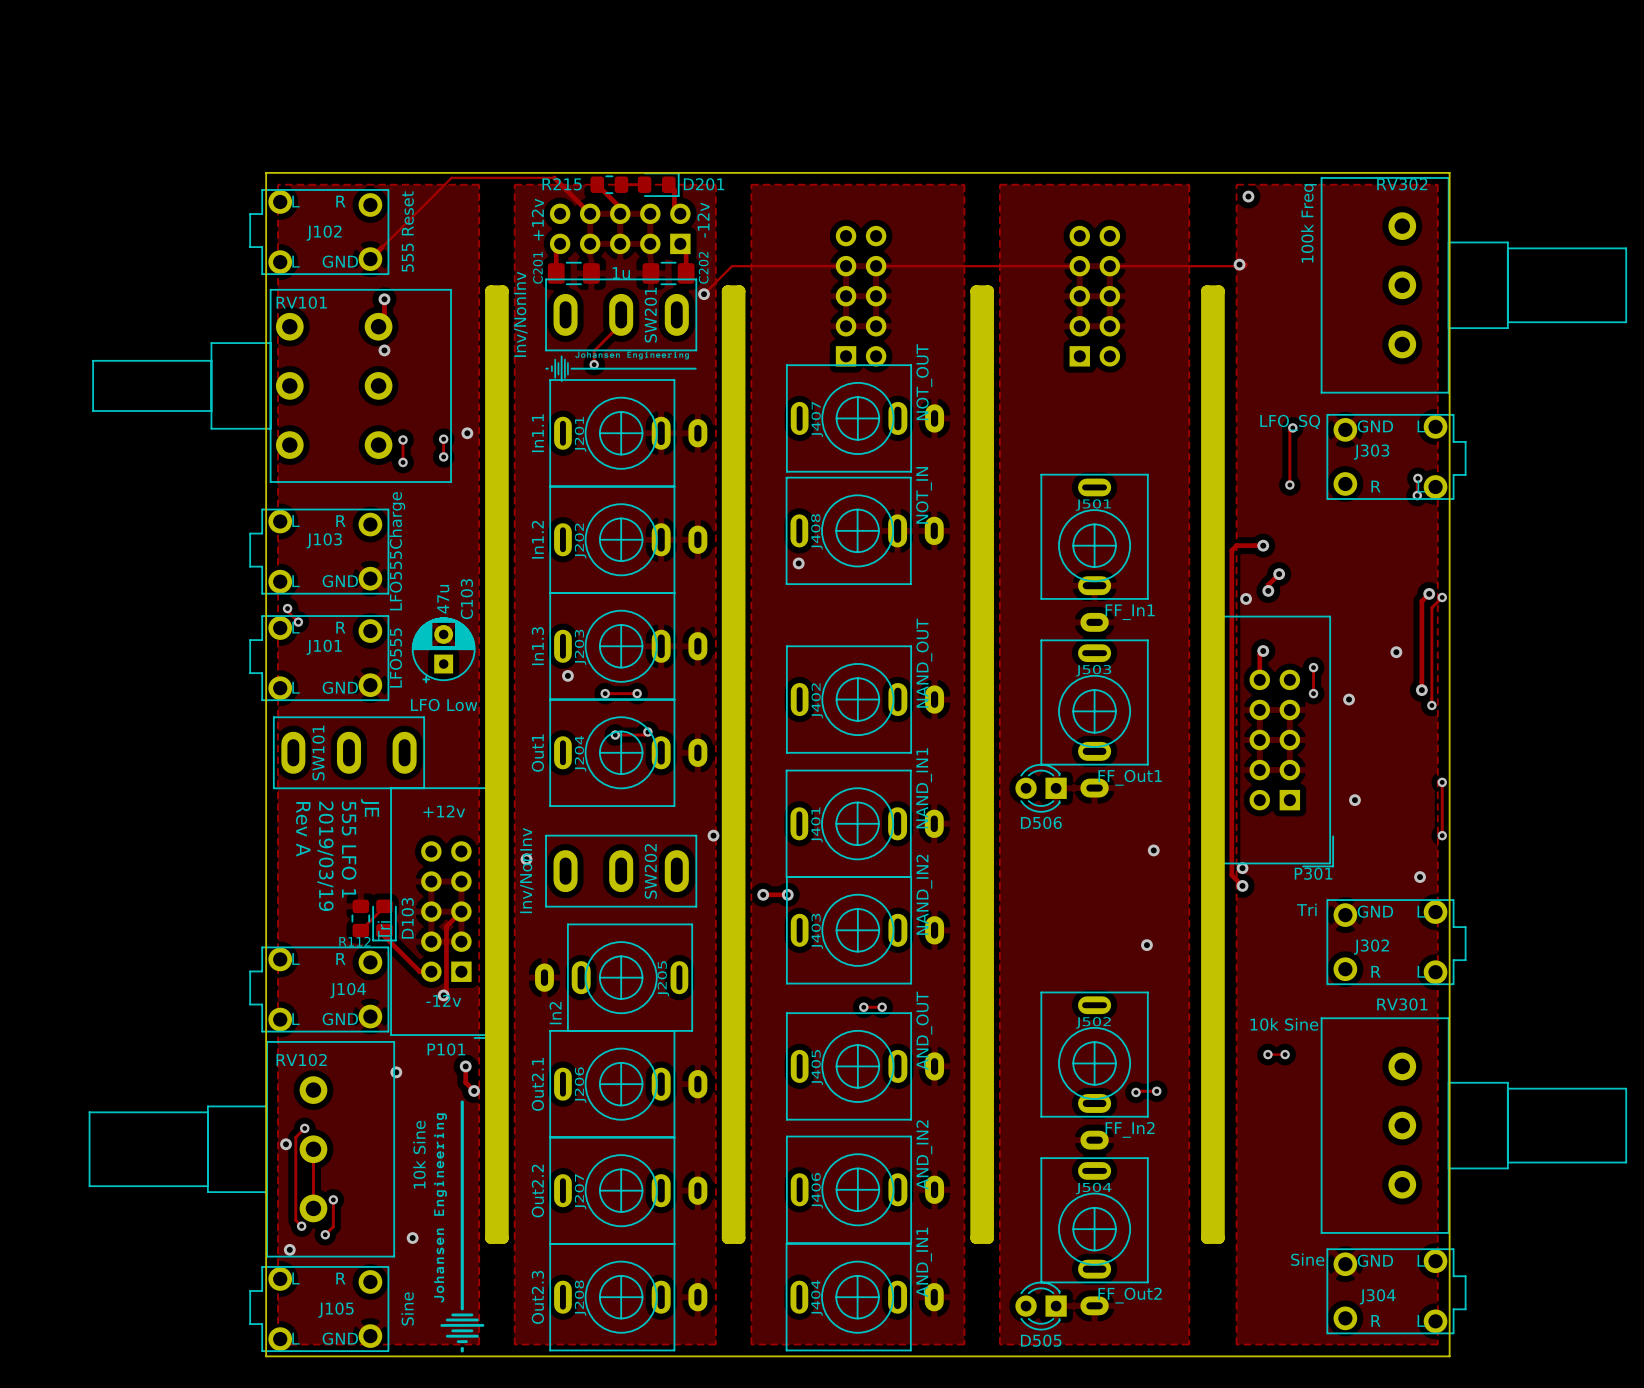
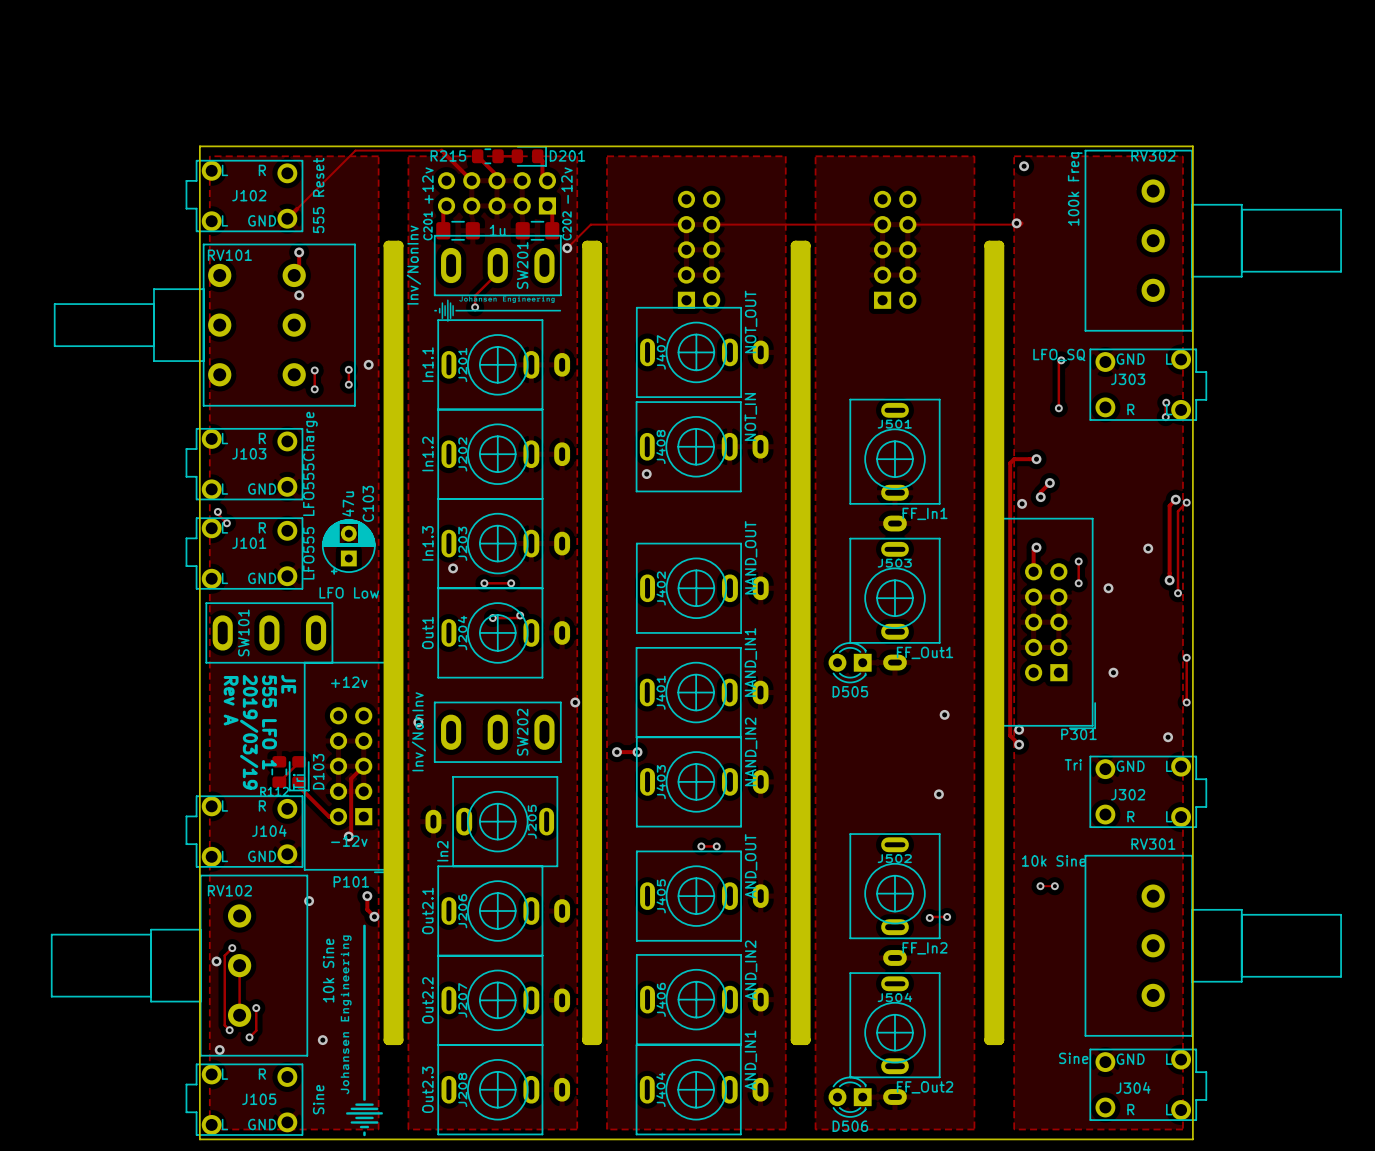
D506 name: D506 (1041, 822) -> D505 (850, 691)
D505 name: D505 (1041, 1340) -> D506 (850, 1126)

